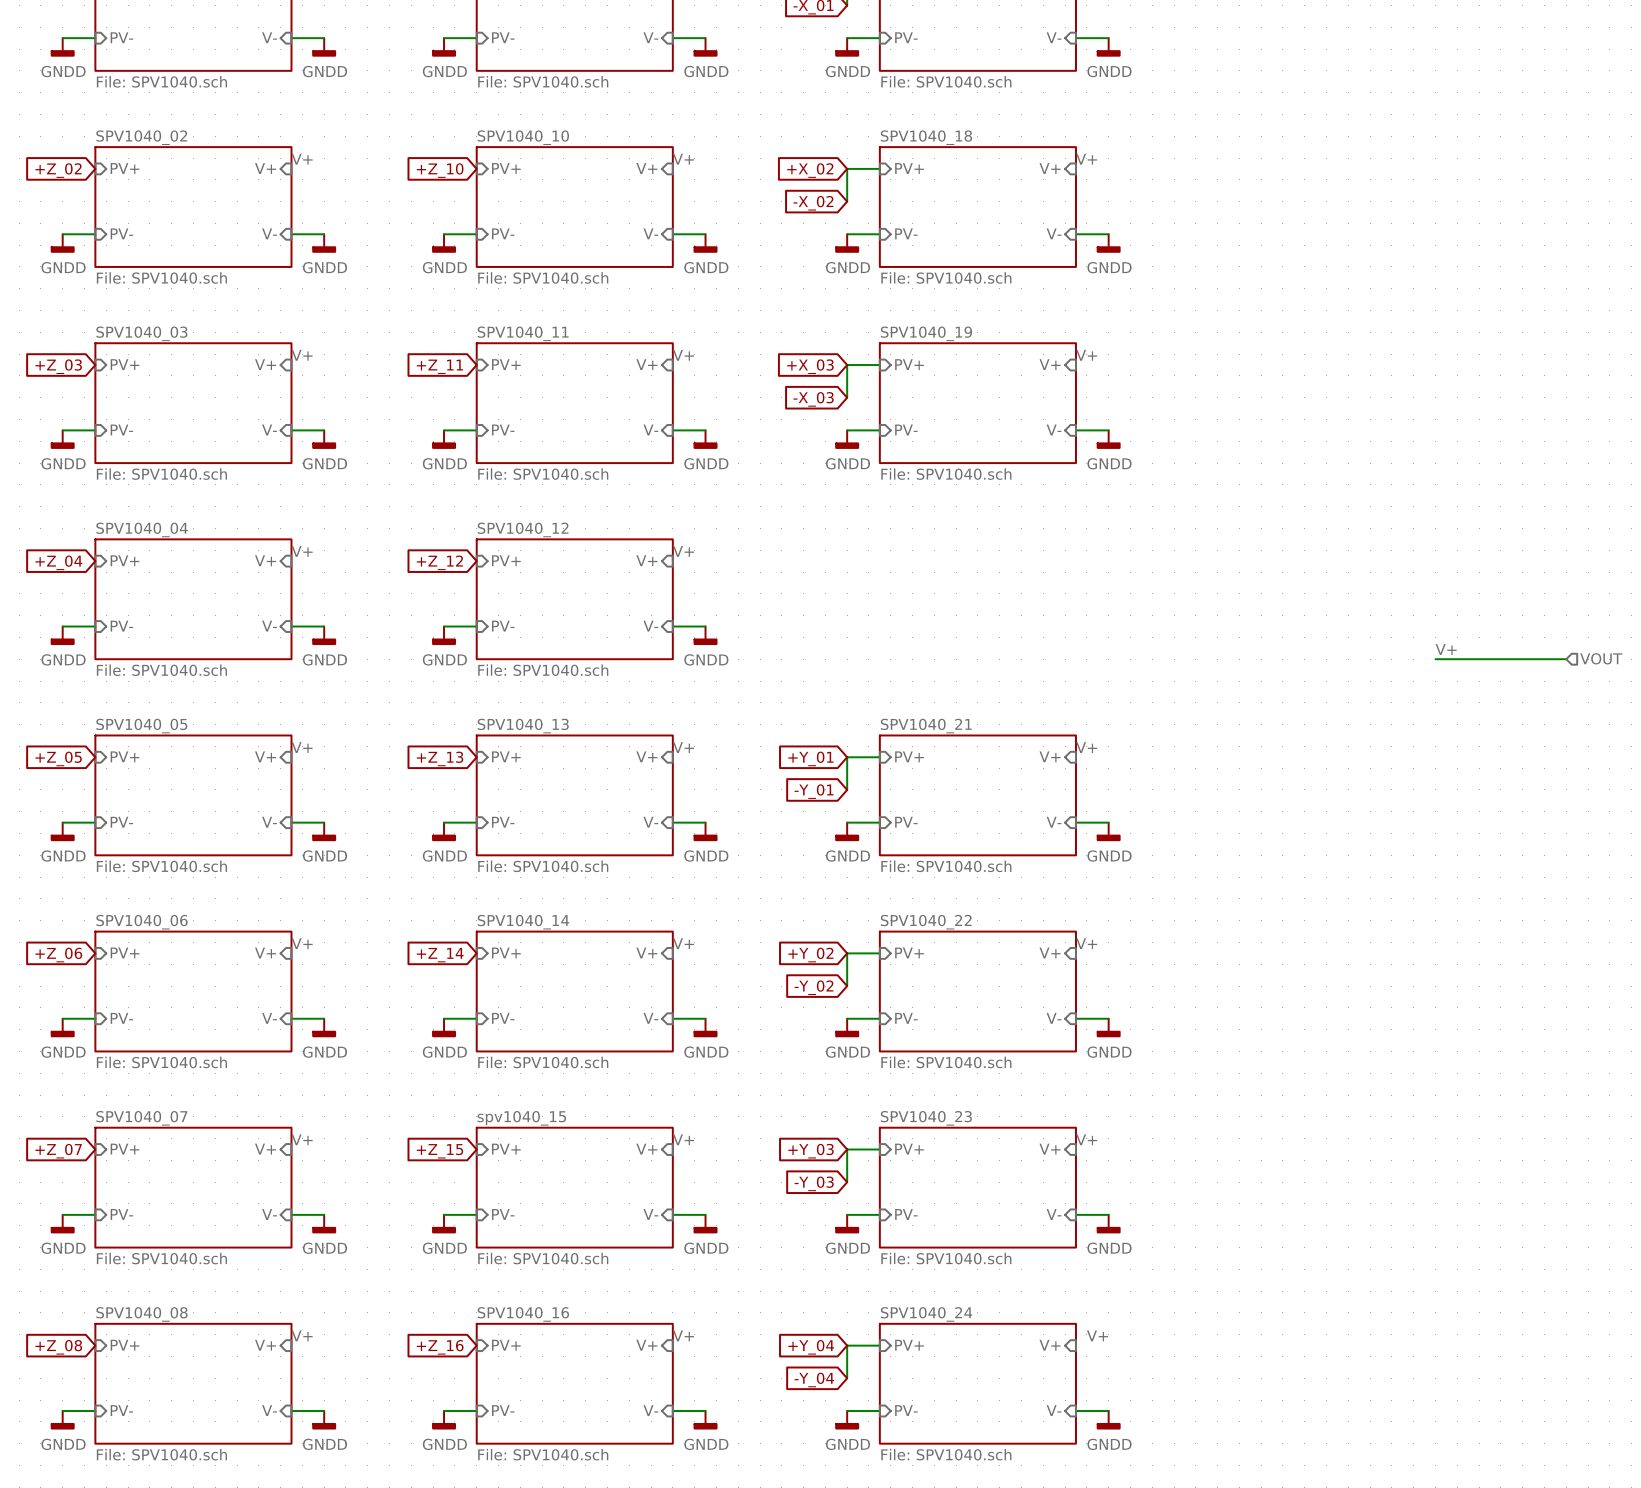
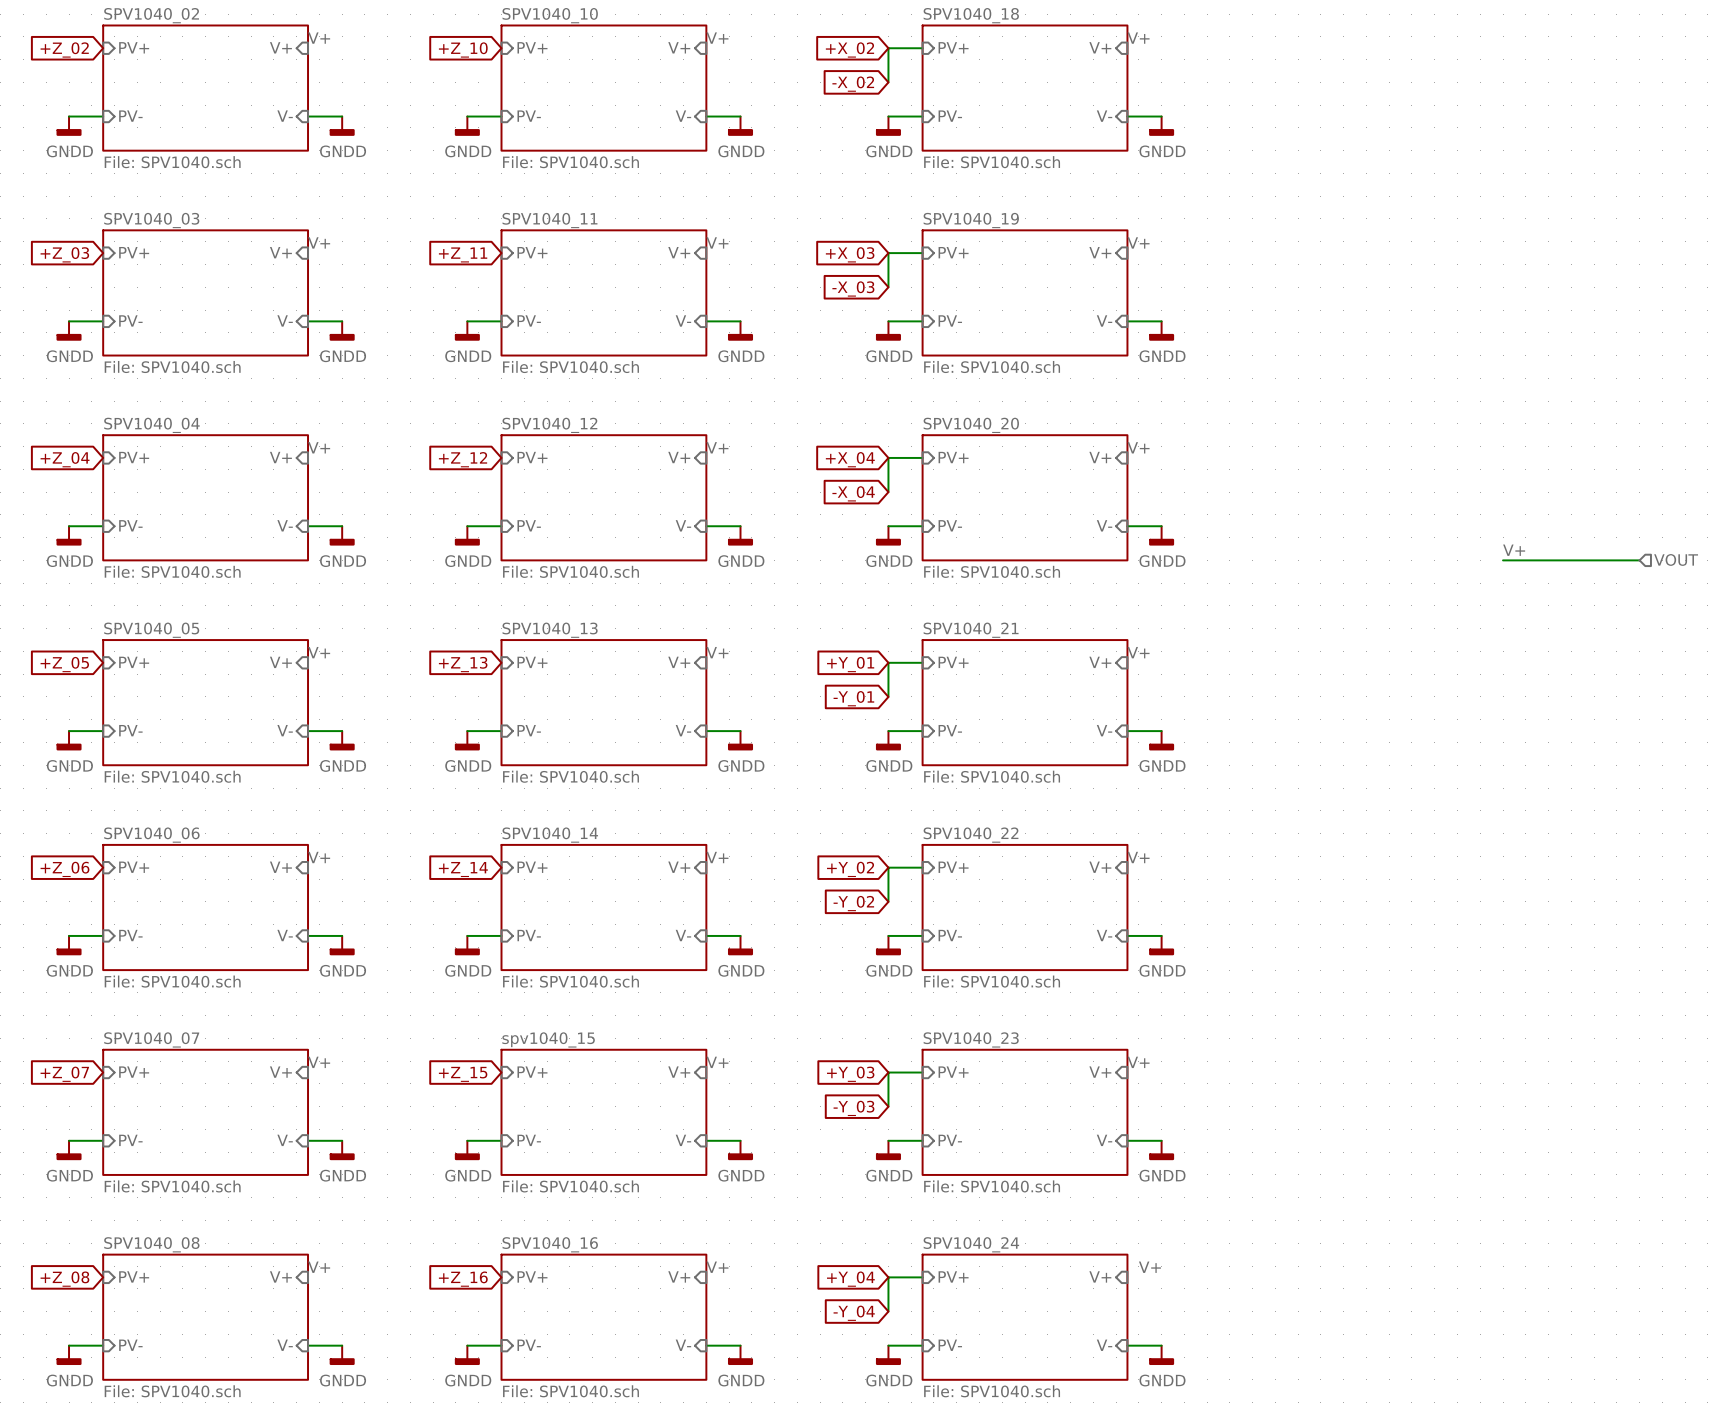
label: none -> V+ (1138, 447)
sheet pin: none -> PV+ (953, 457)
sheet pin: none -> V+ (1100, 457)
wire: none -> (922, 457) (888, 457) (888, 492)
global label: none -> +X_04 (850, 459)
global label: none -> -X_04 (853, 493)
sheet SPV1040_20: none -> File: SPV1040.sch (1025, 497)
wire: none -> (888, 526) (922, 526)
sheet pin: none -> PV- (950, 525)
sheet pin: none -> V- (1104, 525)
wire: none -> (1127, 526) (1161, 526)
power symbol: none -> GNDD (888, 535)
power symbol: none -> GNDD (1161, 535)

